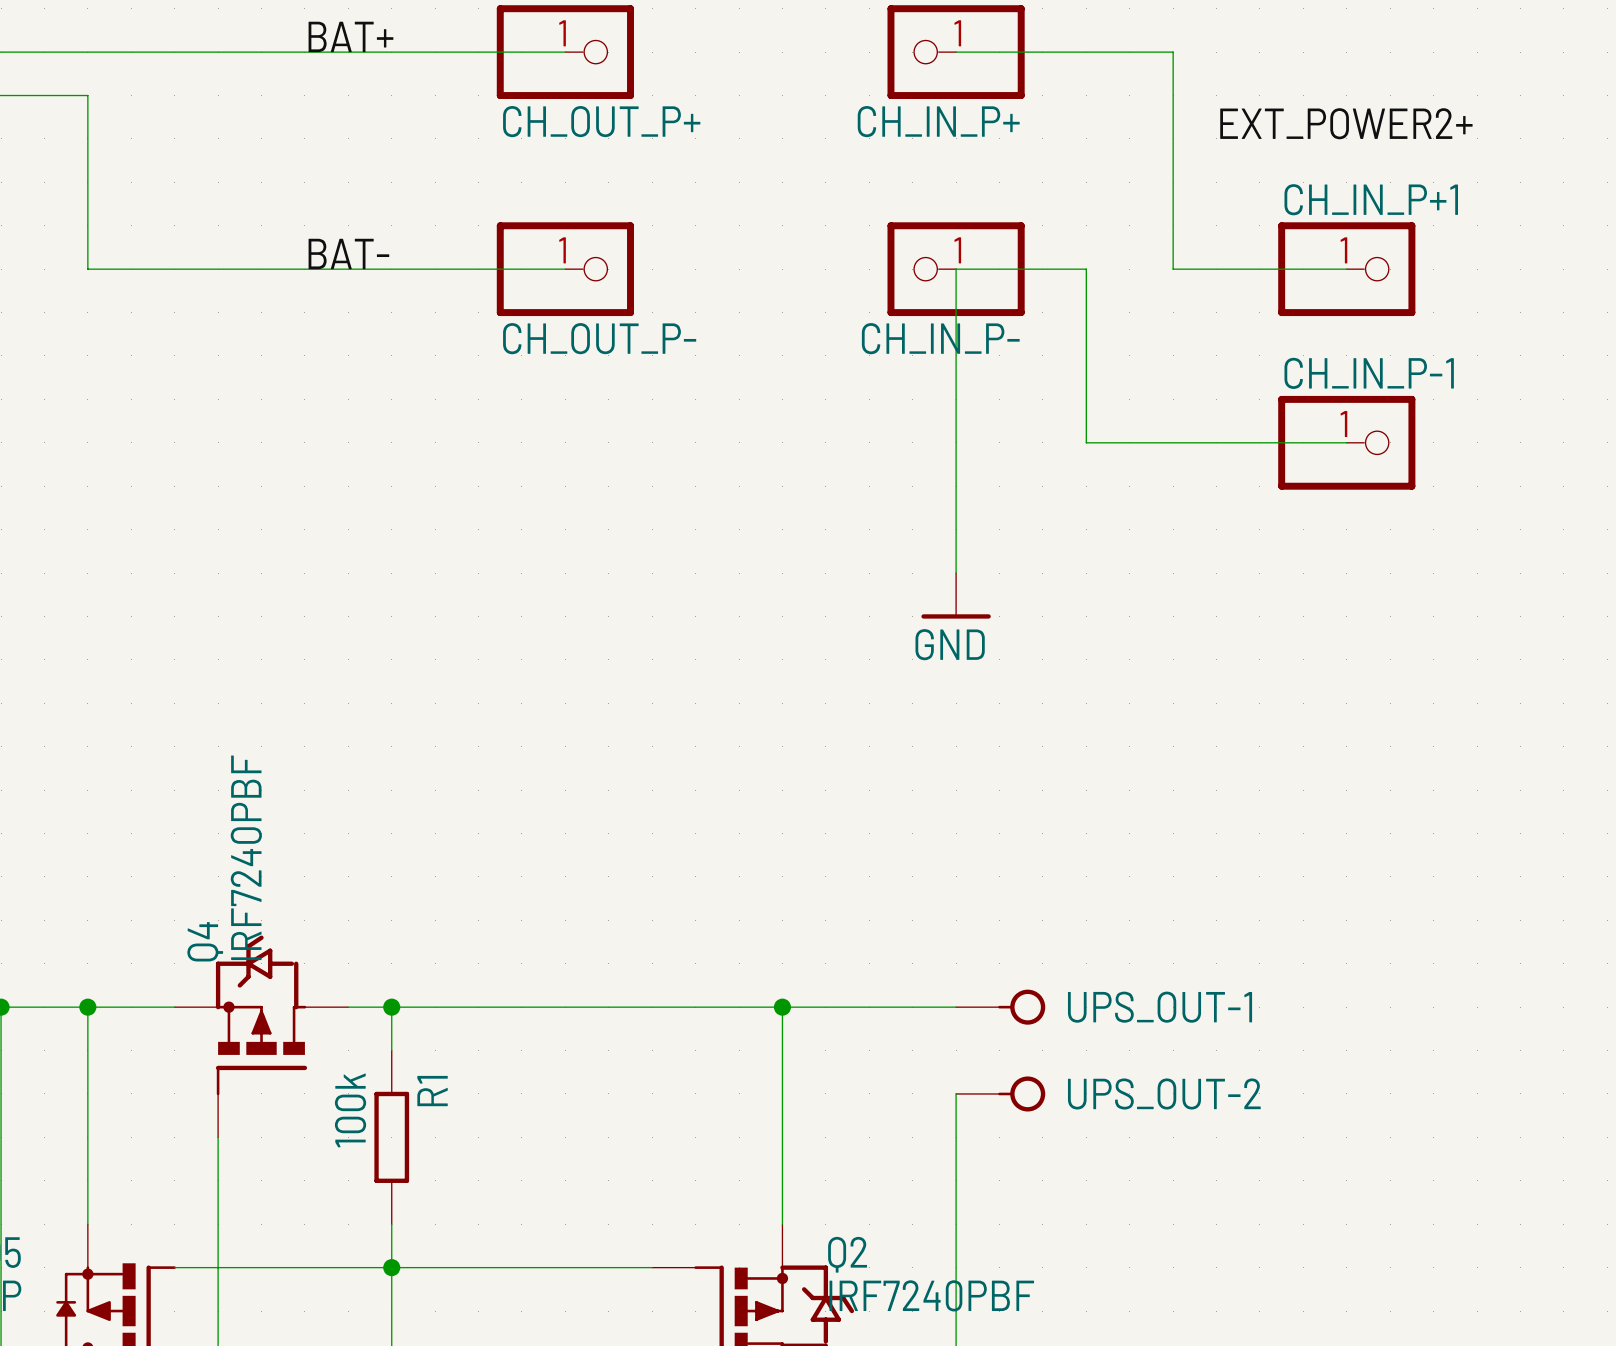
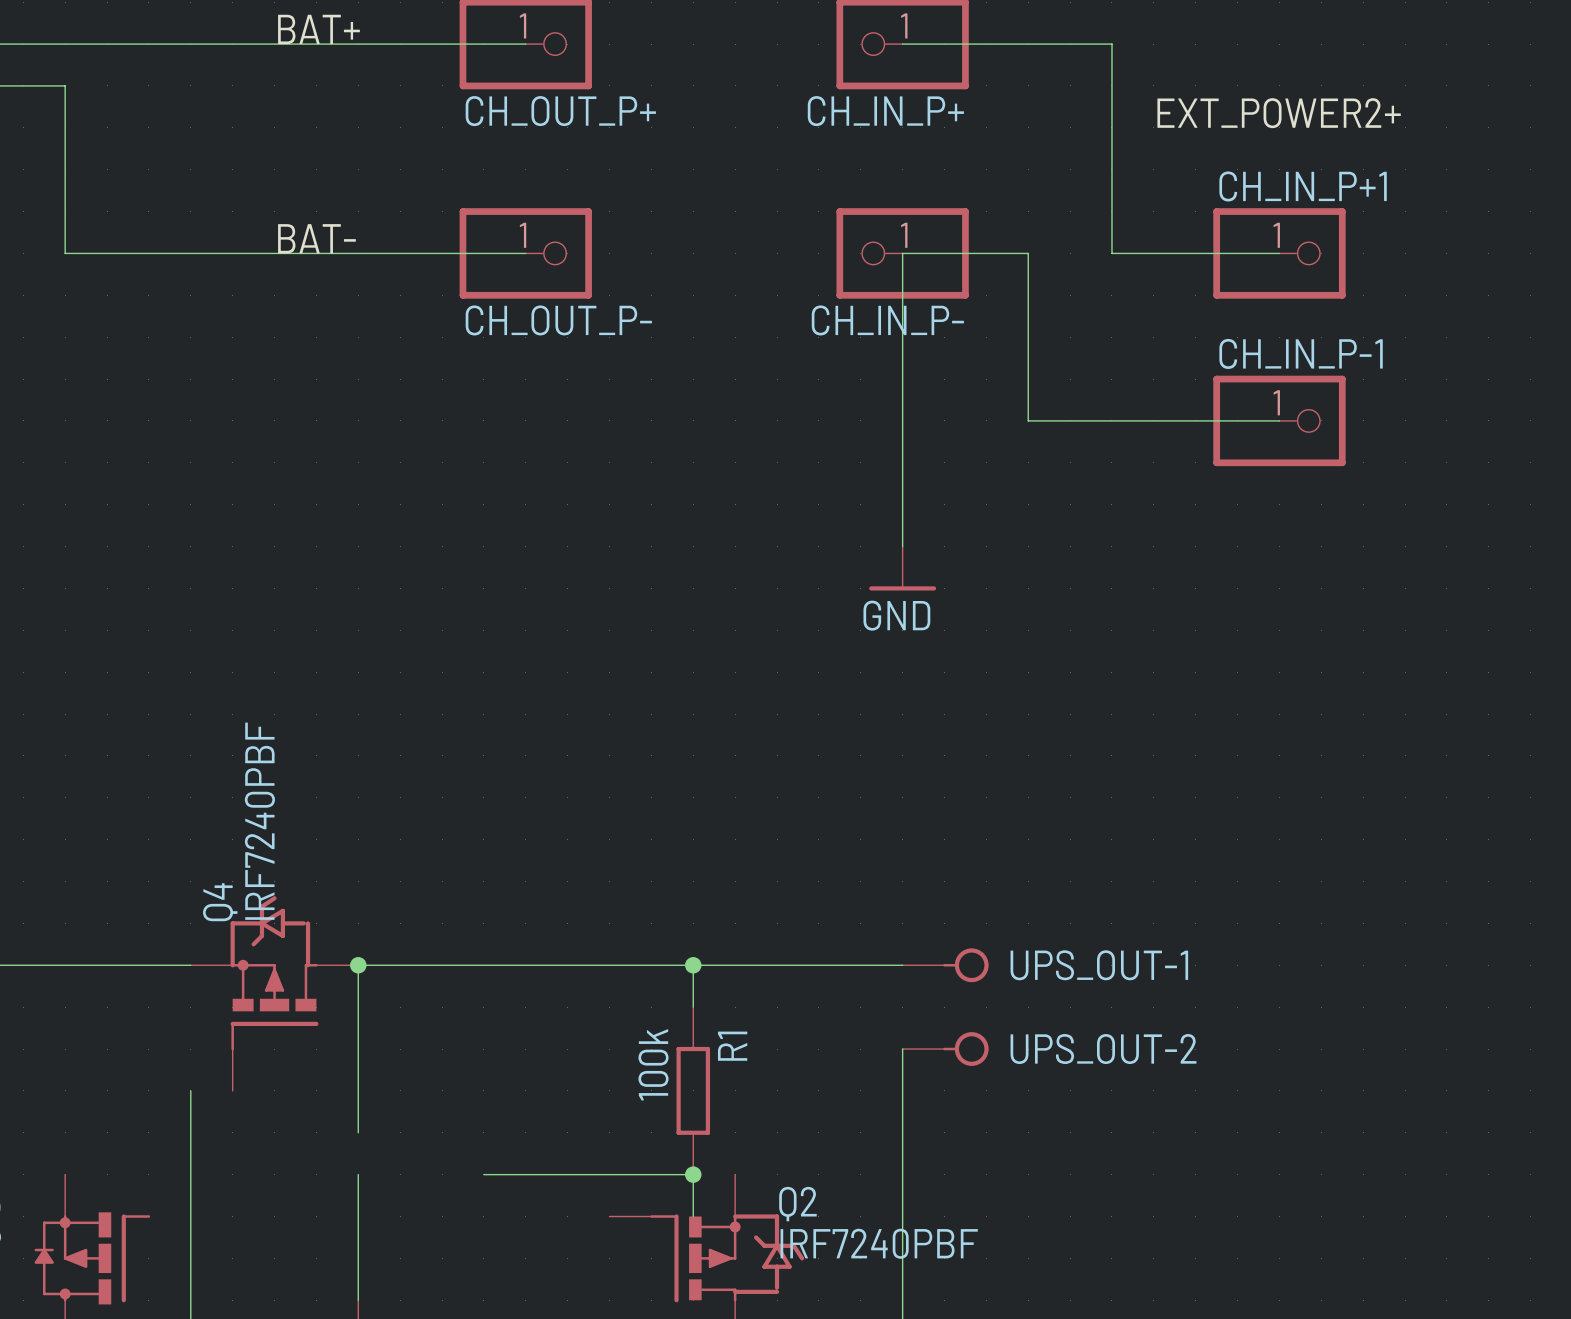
wire: (87, 1007) (87, 1224) -> none
junction: (87, 1007) -> none
wire: none -> (693, 965) (693, 1007)
wire: (782, 1007) (782, 1224) -> none
junction position: (782, 1007) -> (693, 965)
Q4 position: (261, 1036) -> (274, 993)
wire: none -> (358, 1007) (358, 1132)
R1 position: (391, 1137) -> (693, 1090)
wire: none -> (483, 1174) (693, 1174) (693, 1216)
junction: none -> (693, 1174)
wire: (174, 1267) (652, 1267) -> none
junction: (391, 1267) -> none

